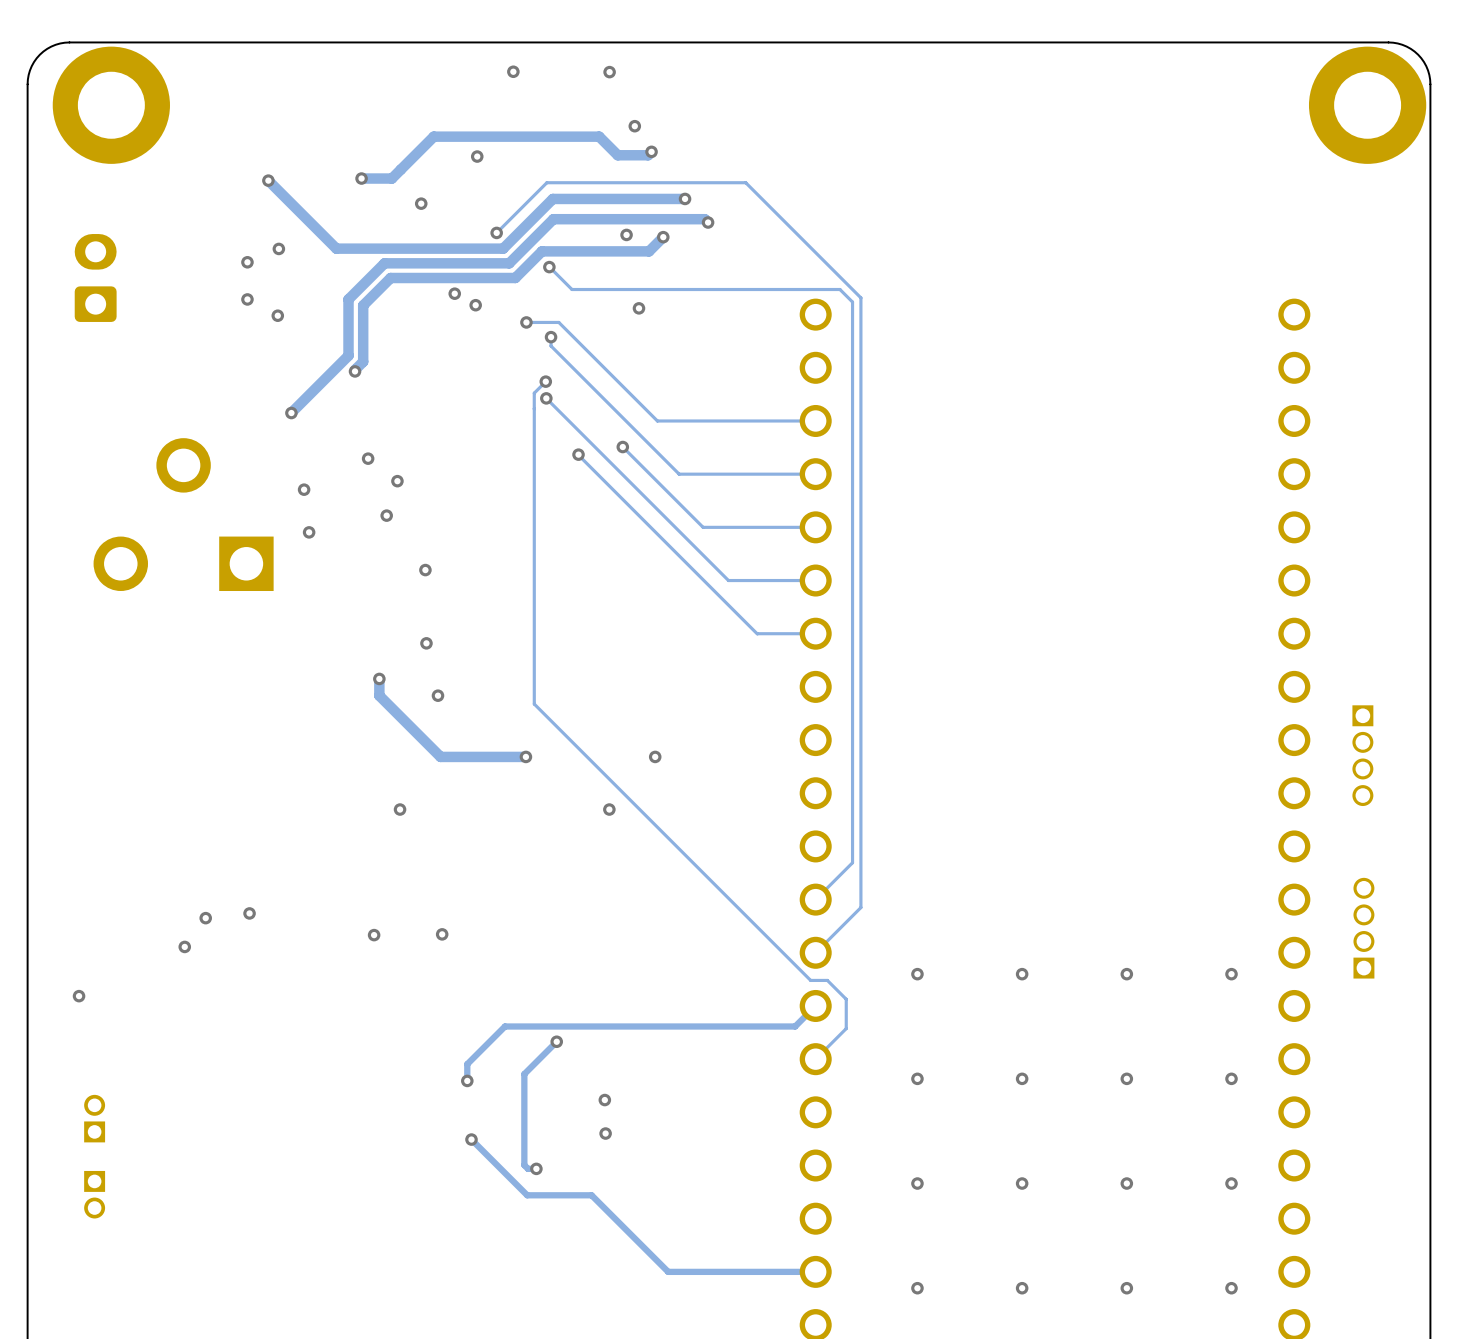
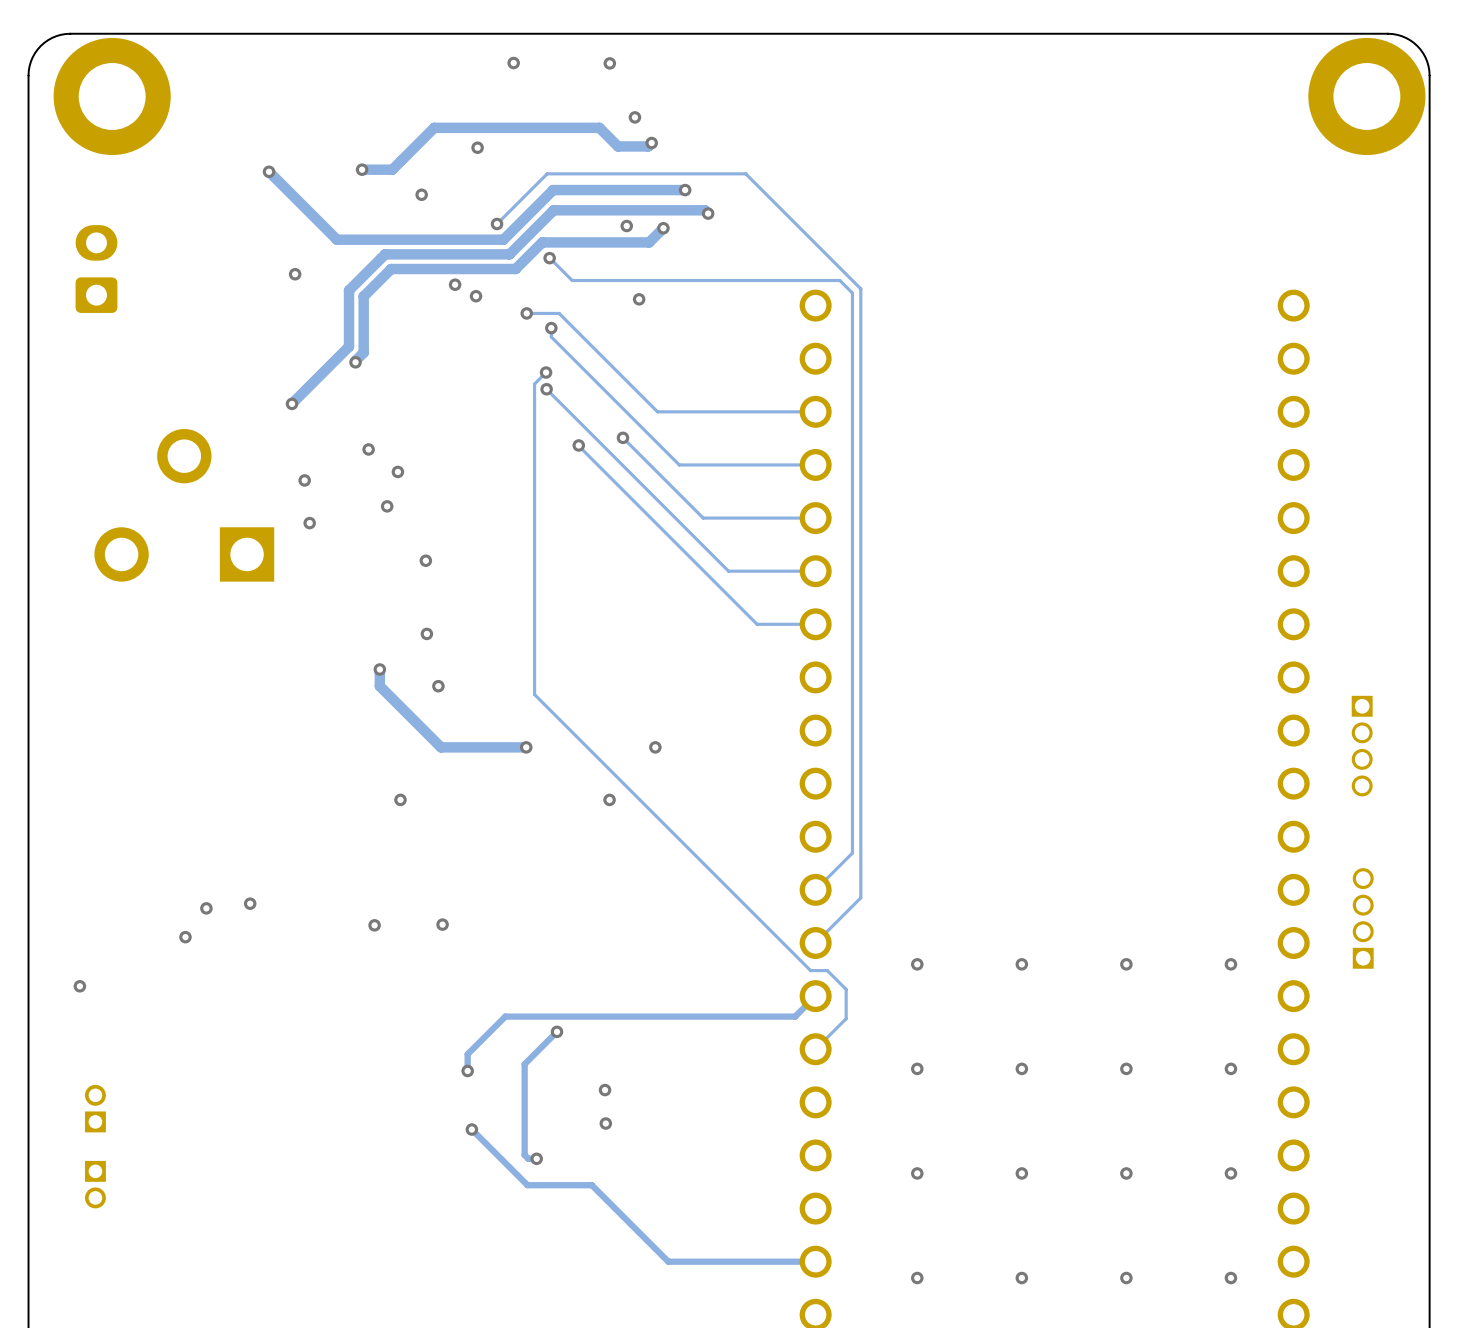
via: (278, 248) -> none
via: (247, 262) -> none
via: none -> (295, 274)
via: (247, 299) -> none
via: (277, 315) -> none

